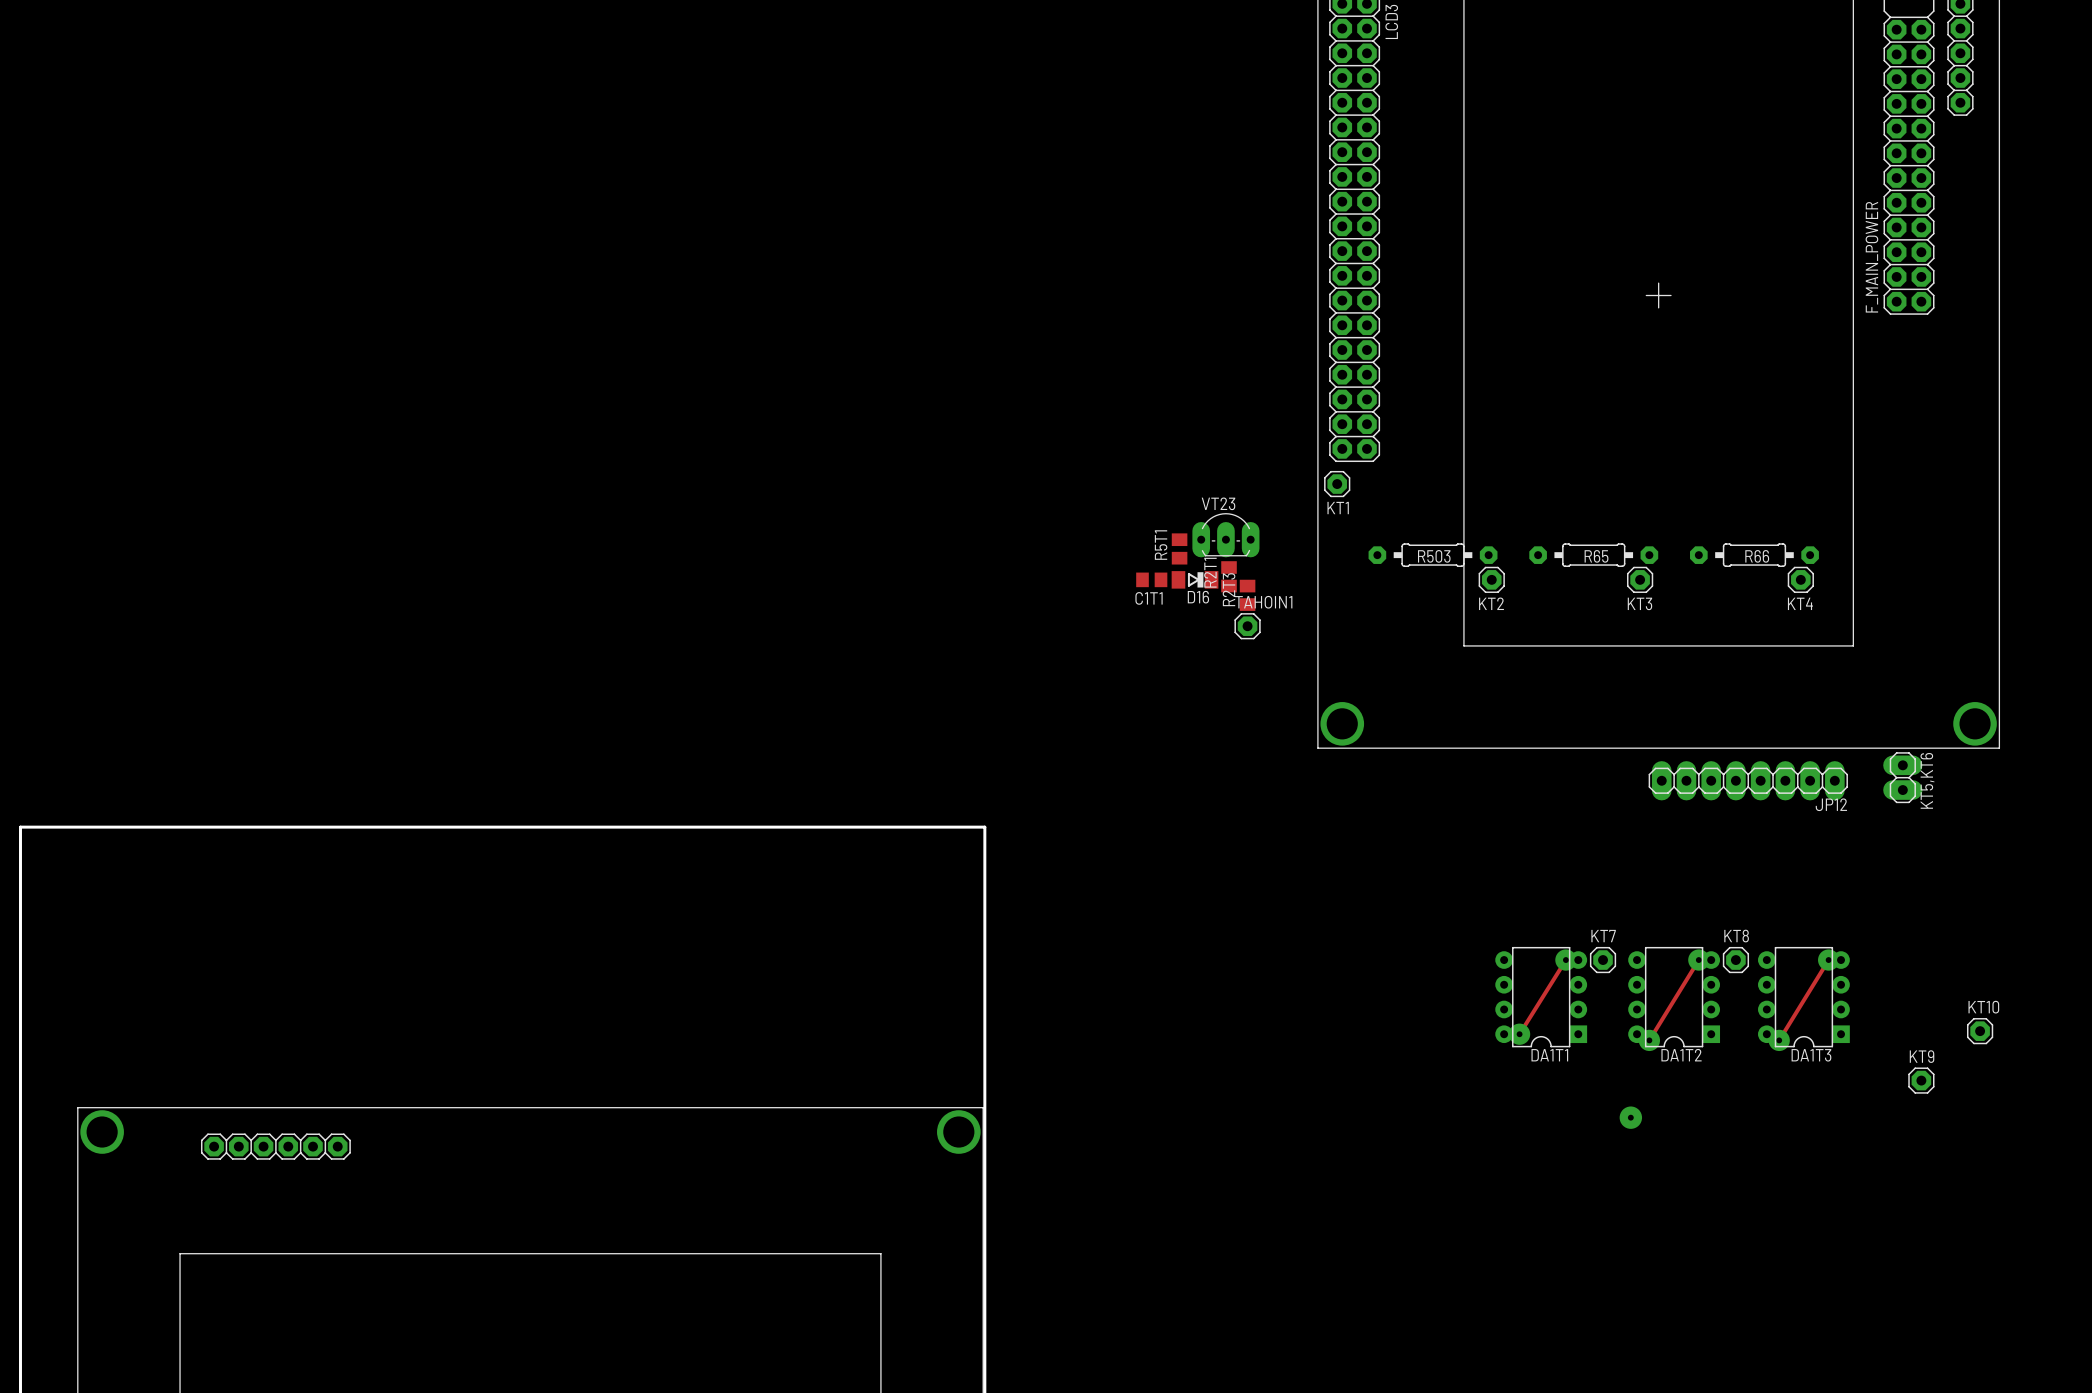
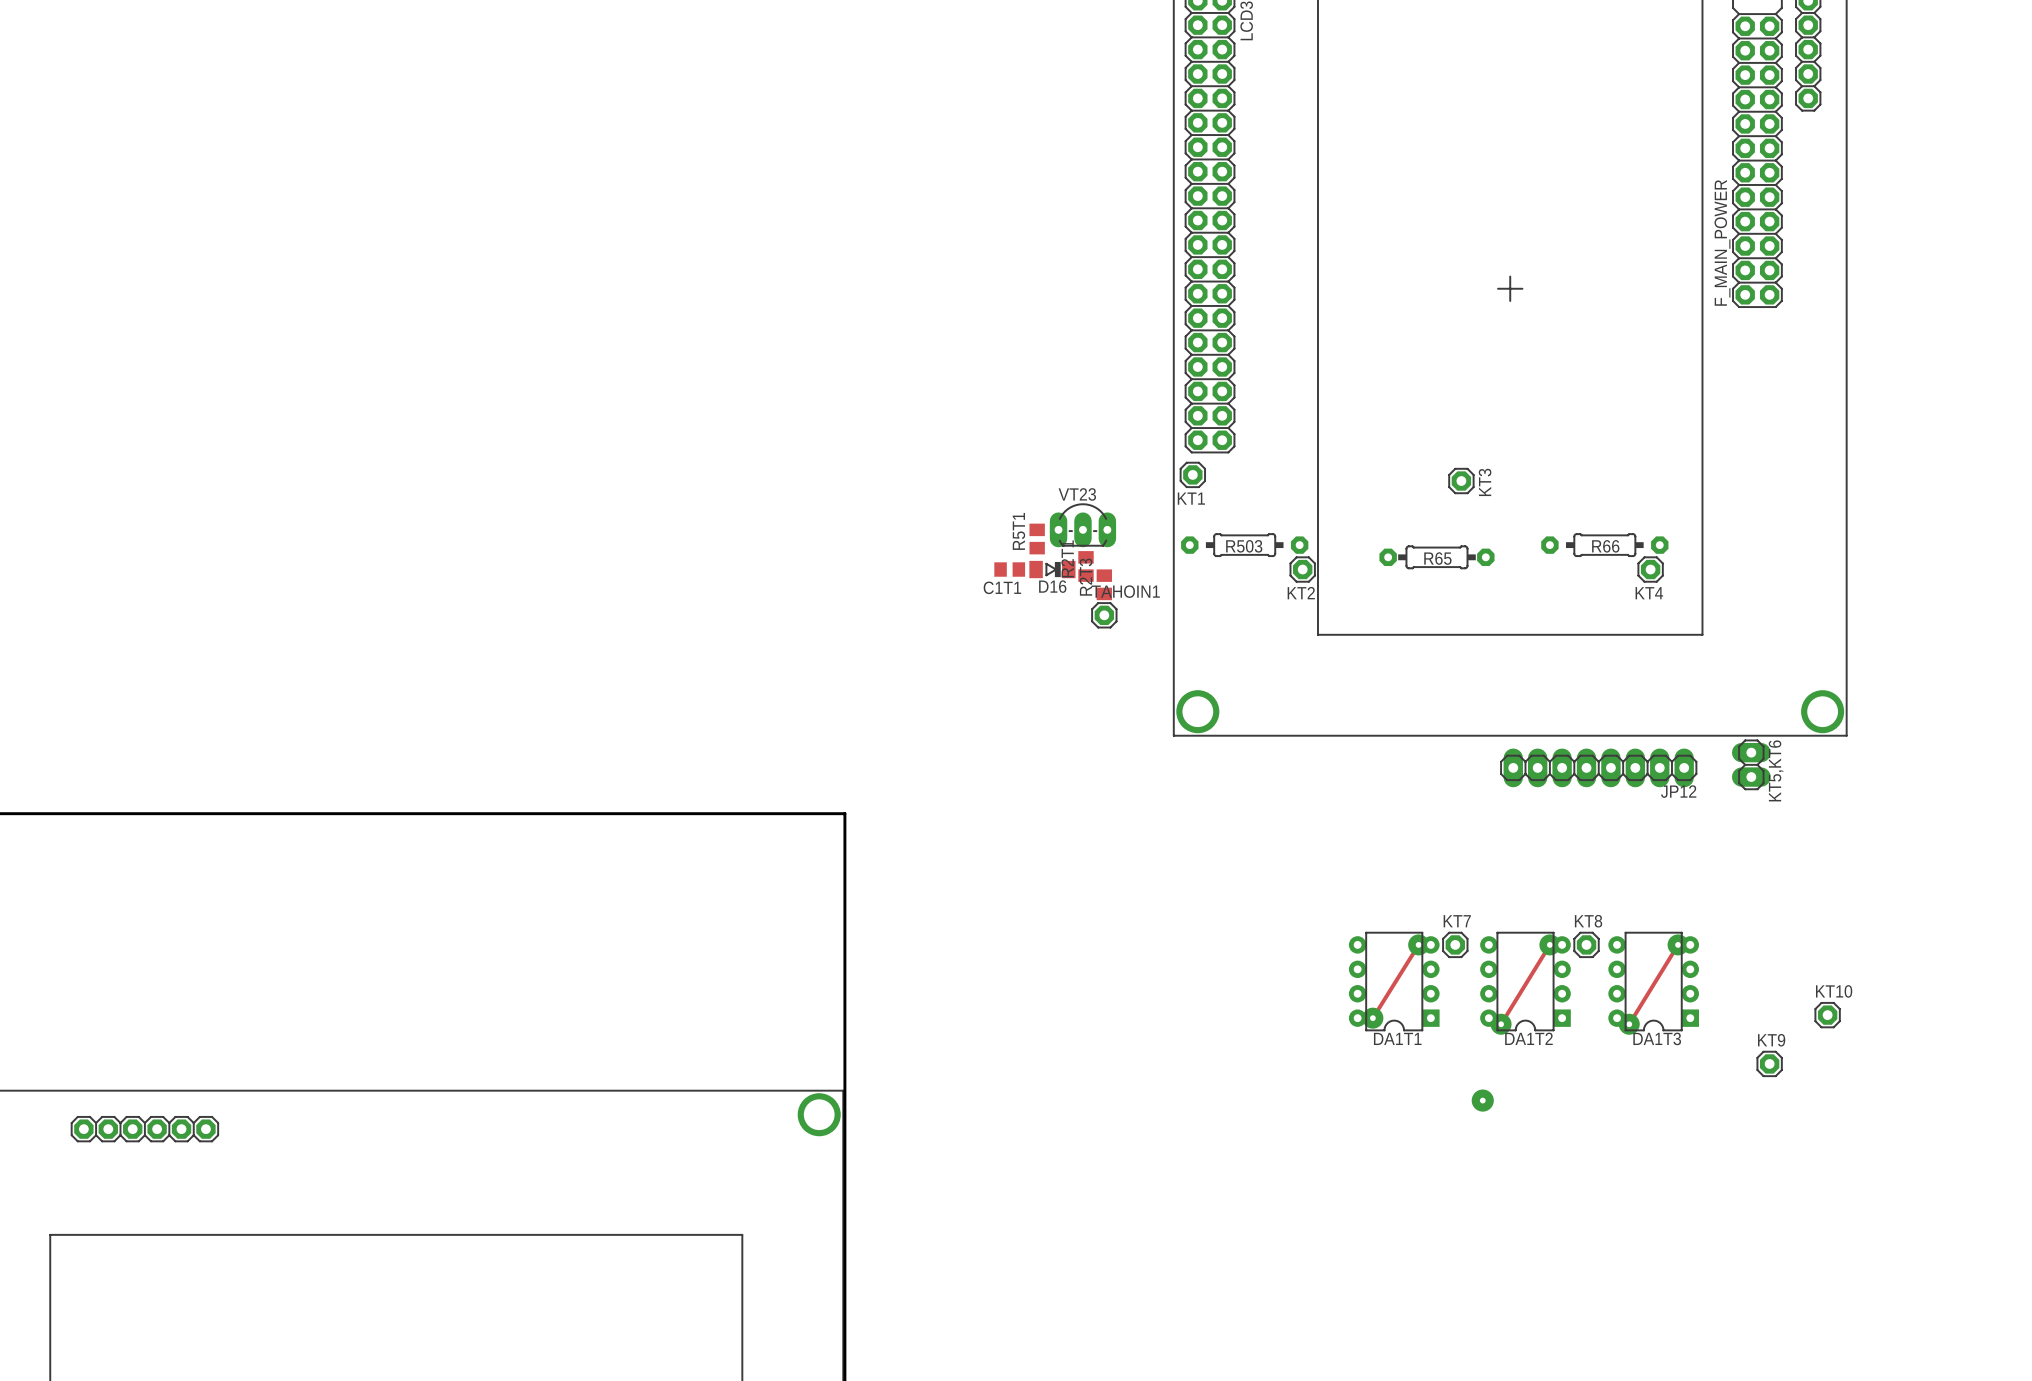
R65 footprint: [1529, 543, 1659, 568] -> [1379, 545, 1495, 570]
R503 position: (1433, 555) -> (1244, 545)
KT2 position: (1491, 579) -> (1302, 569)
KT3 position: (1640, 579) -> (1461, 481)
KT3 name rotation: 0° (1639, 603) -> 90° counterclockwise (1485, 482)

